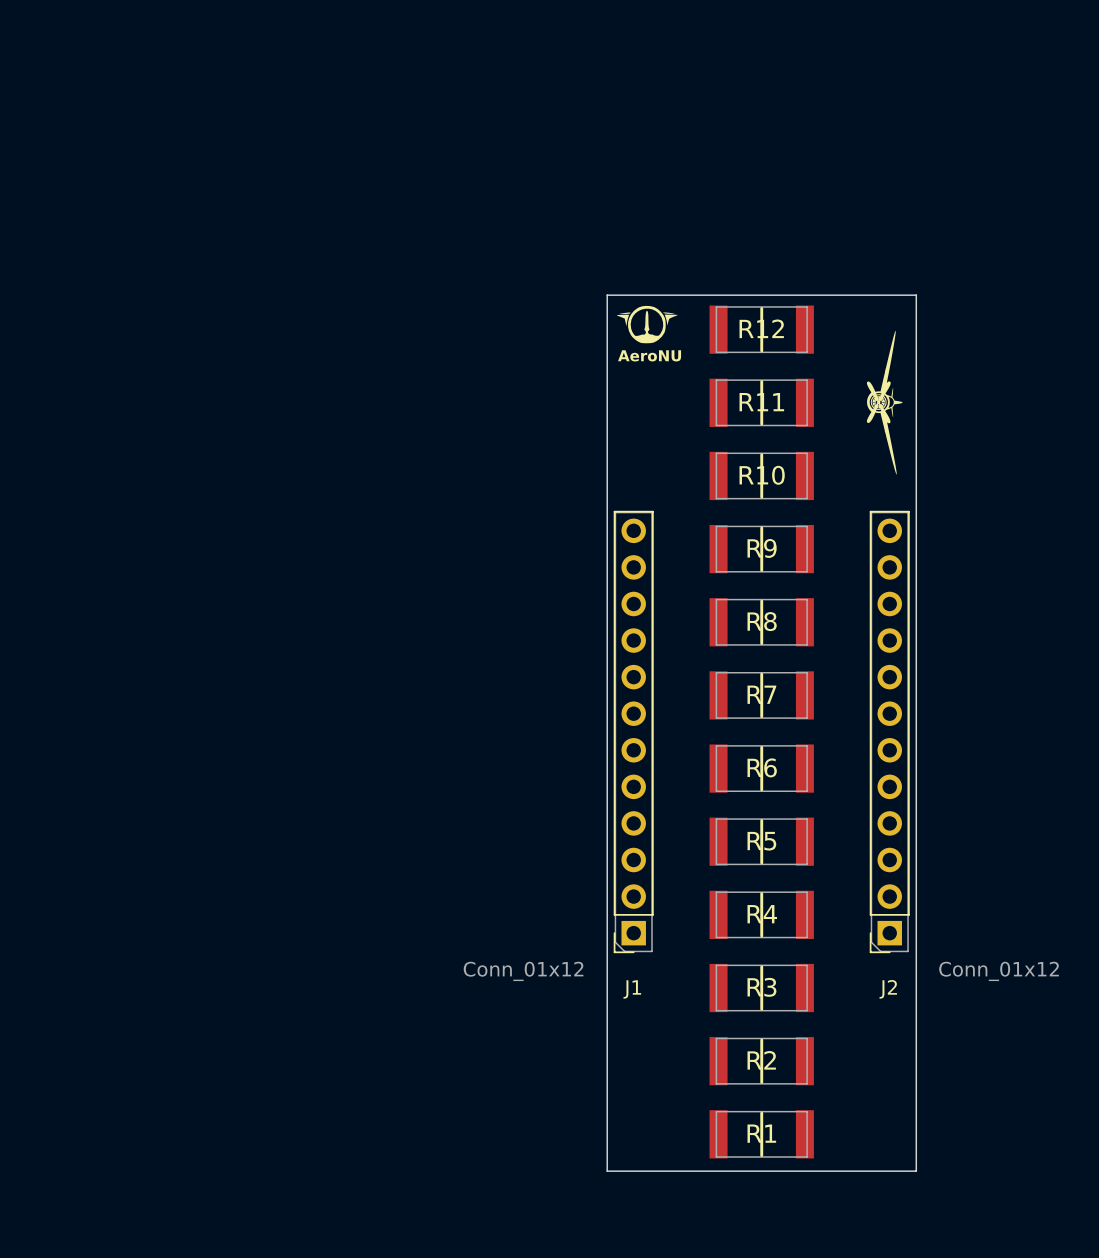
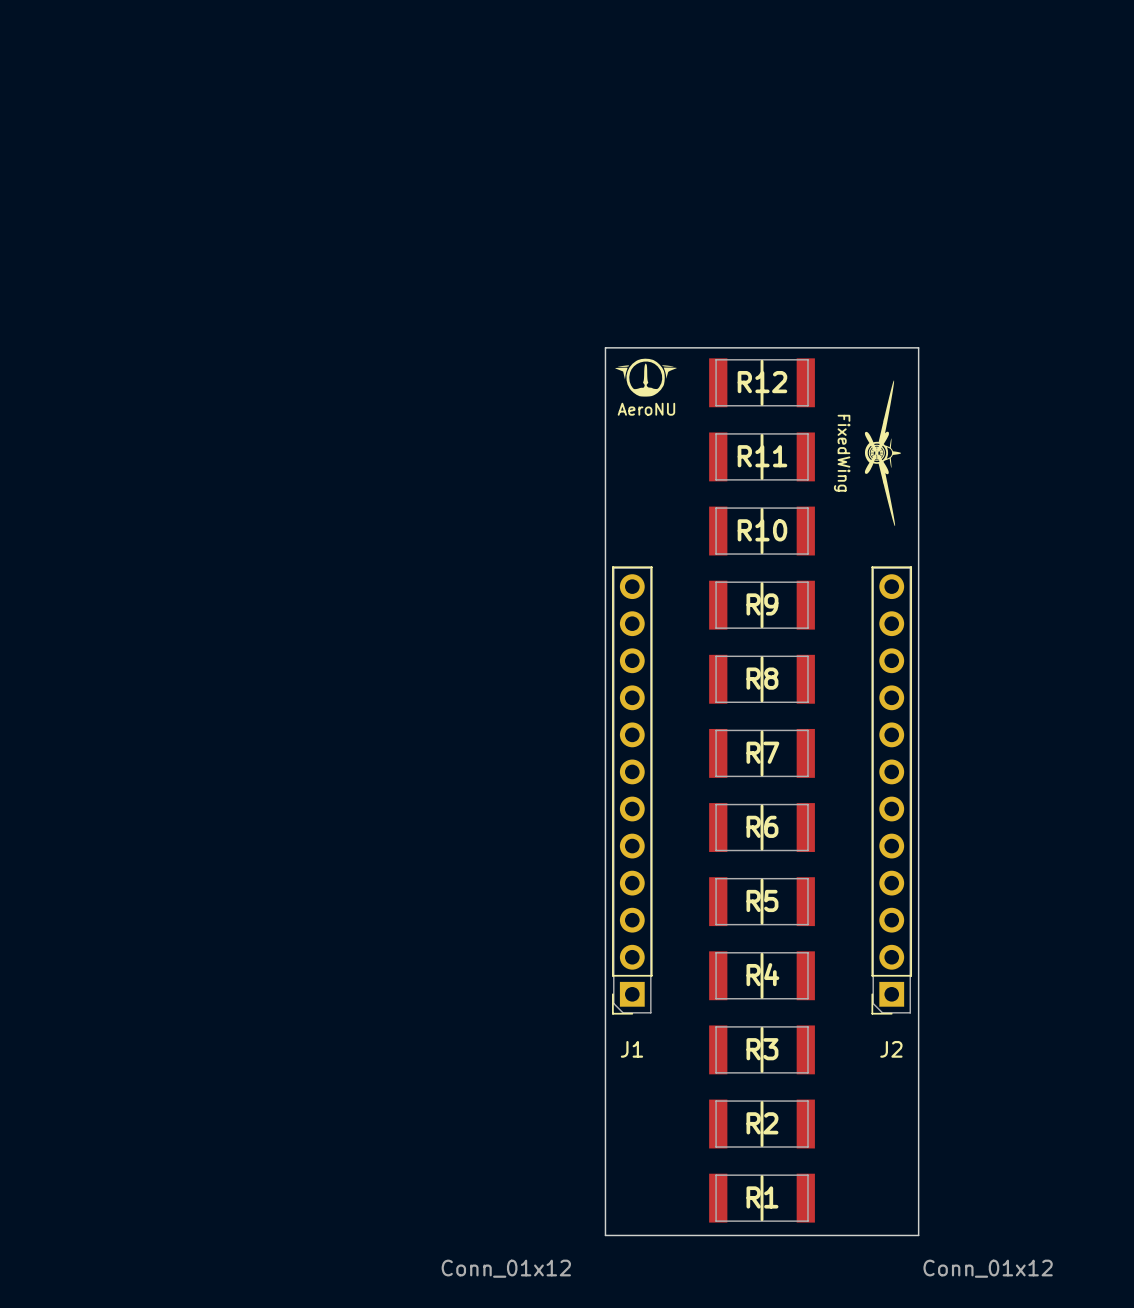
drawing: [866, 330, 903, 475] -> none
FixedWing: none -> (882, 453)
J1 value position: Conn_01x12 (523, 971) -> Conn_01x12 (506, 1268)
J2 value position: Conn_01x12 (999, 971) -> Conn_01x12 (988, 1268)

